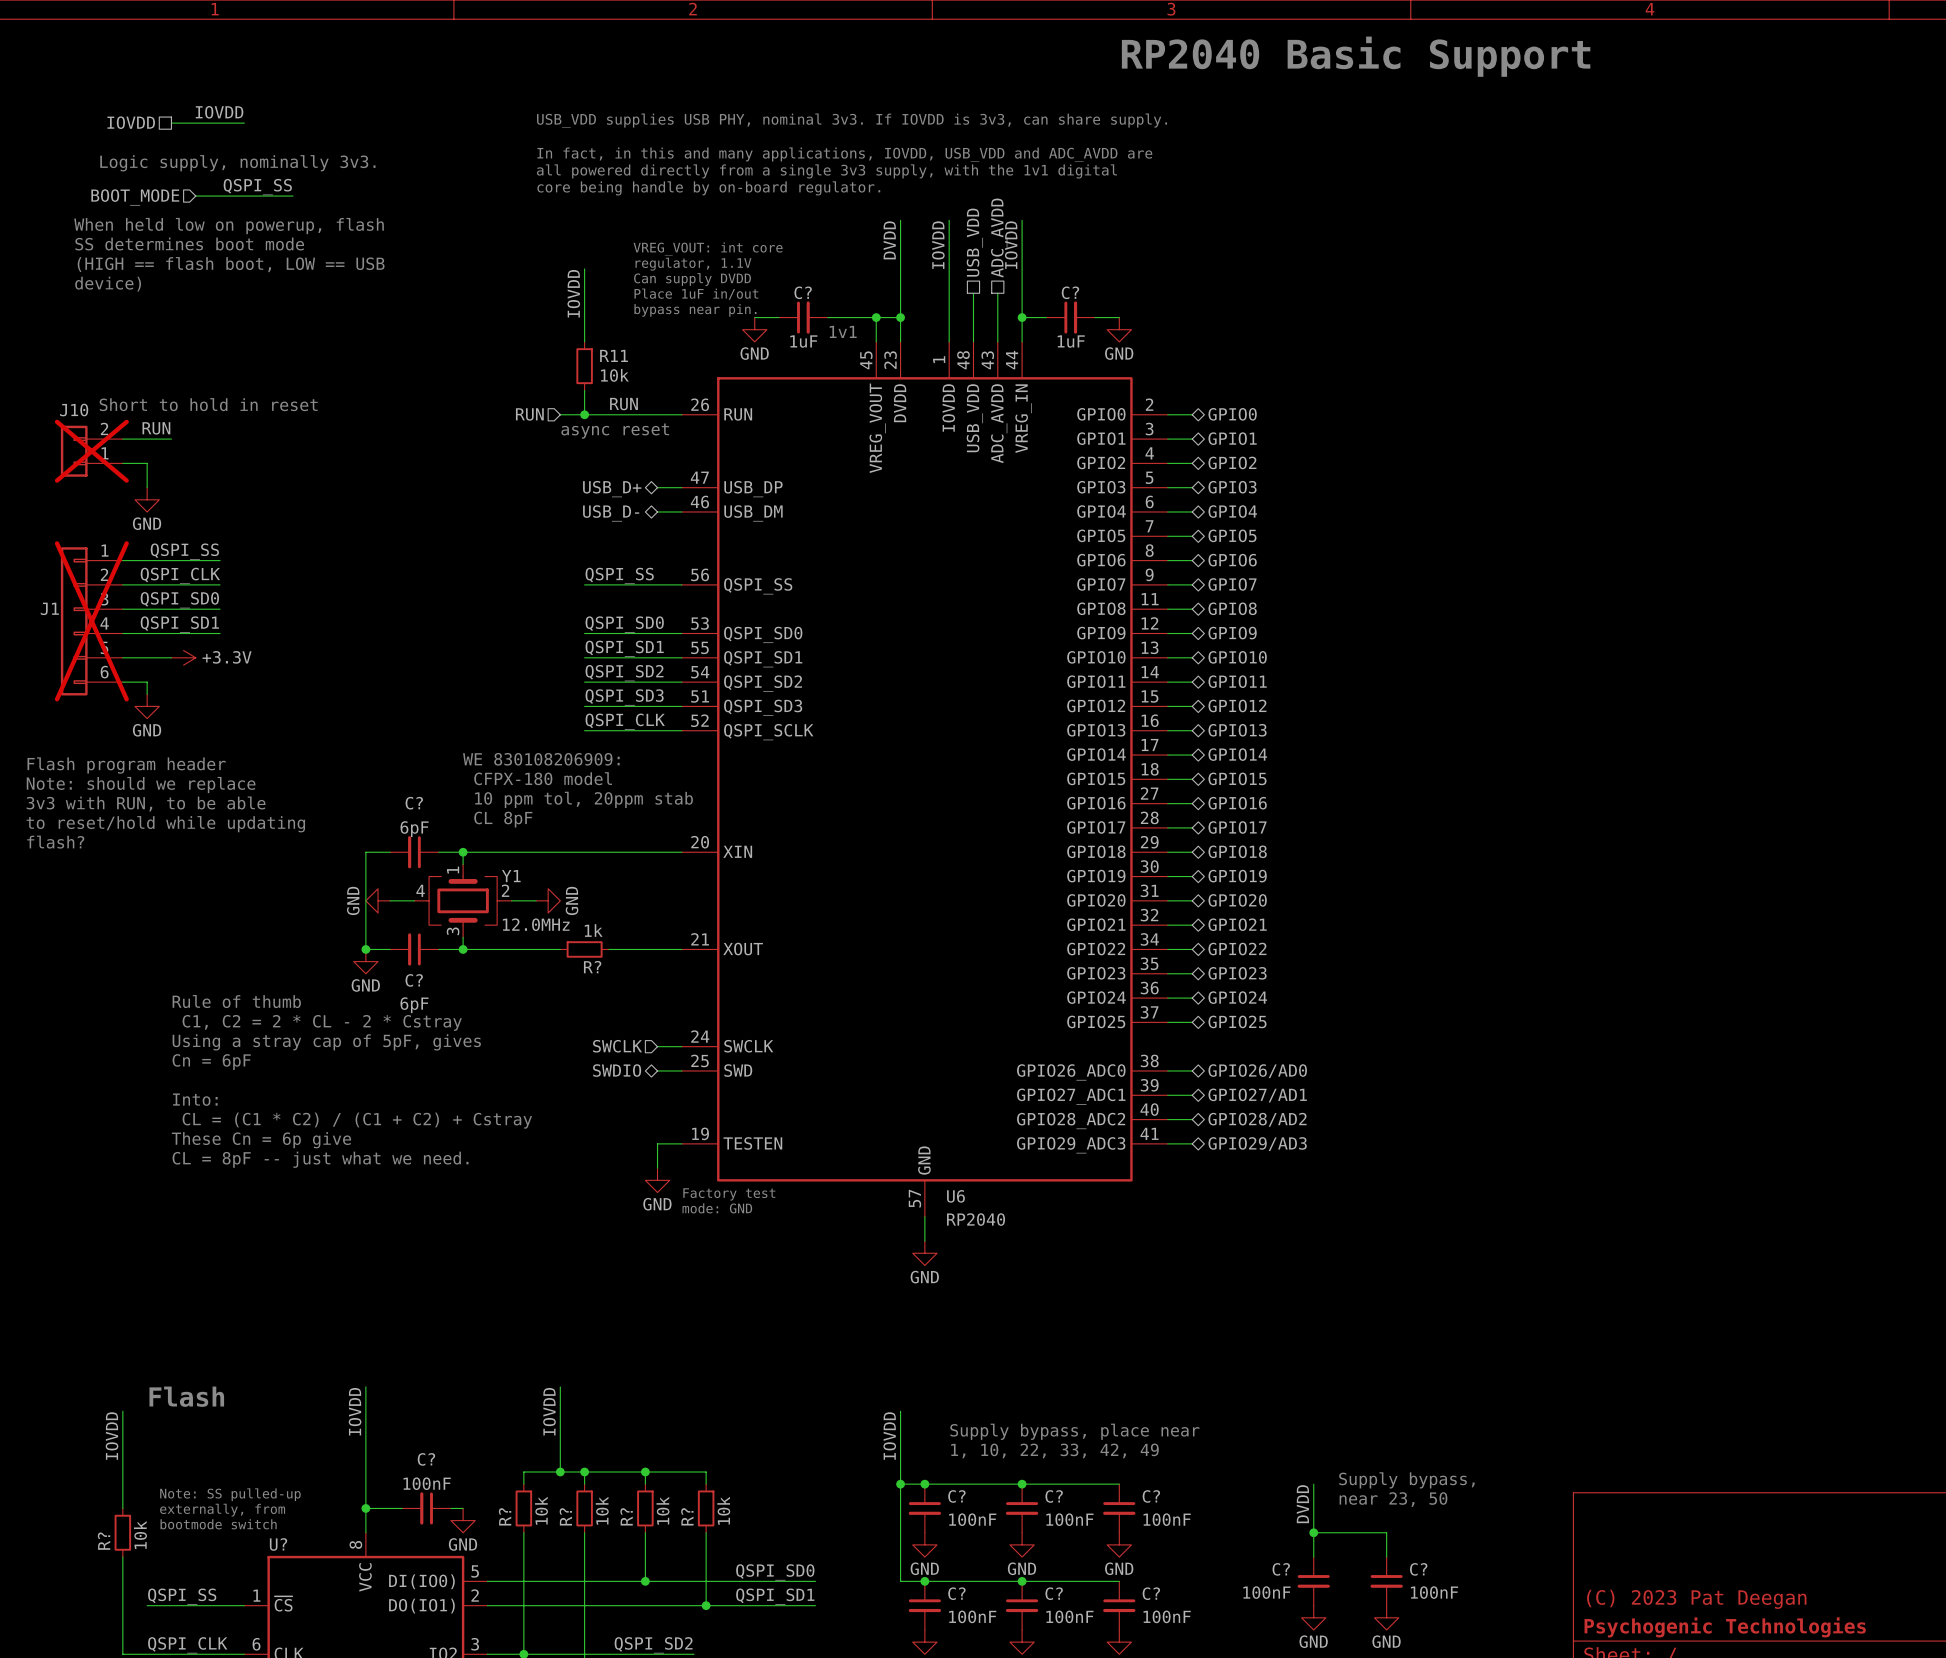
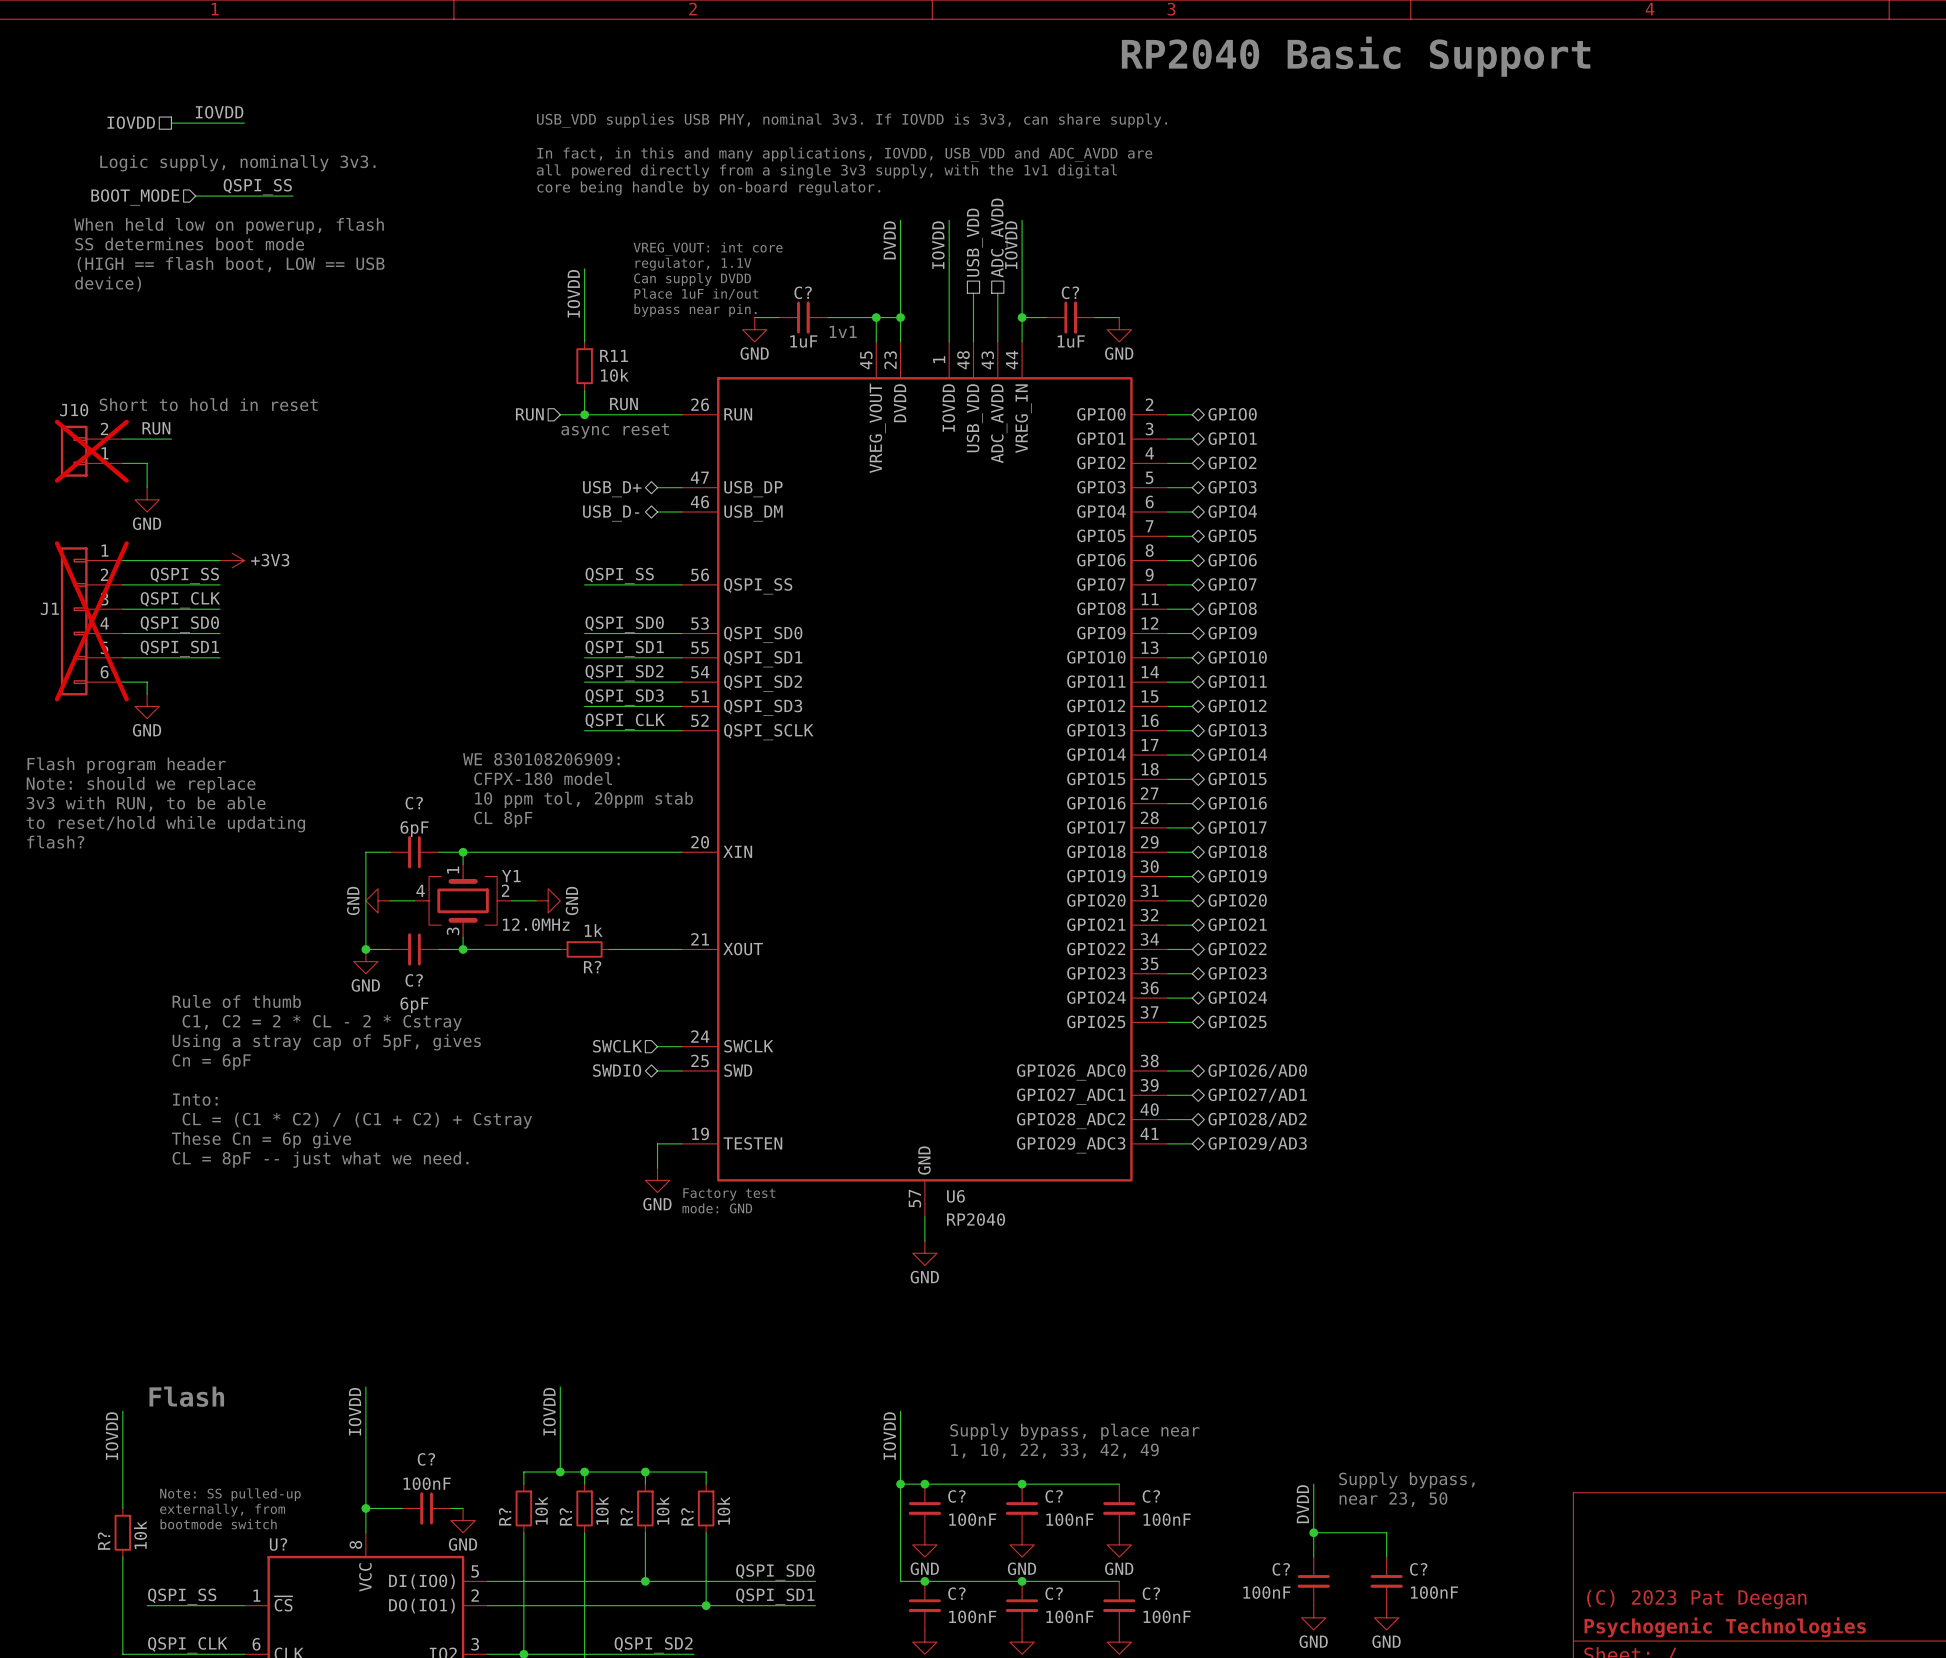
label: QSPI_SS (184, 551) -> none
power symbol: none -> +3V3 (232, 560)
label: QSPI_CLK (180, 575) -> QSPI_SS (184, 575)
label: QSPI_SD0 (179, 600) -> QSPI_CLK (180, 600)
label: QSPI_SD1 (179, 624) -> QSPI_SD0 (179, 624)
label: none -> QSPI_SD1 (179, 648)
power symbol: +3.3V (183, 657) -> none

